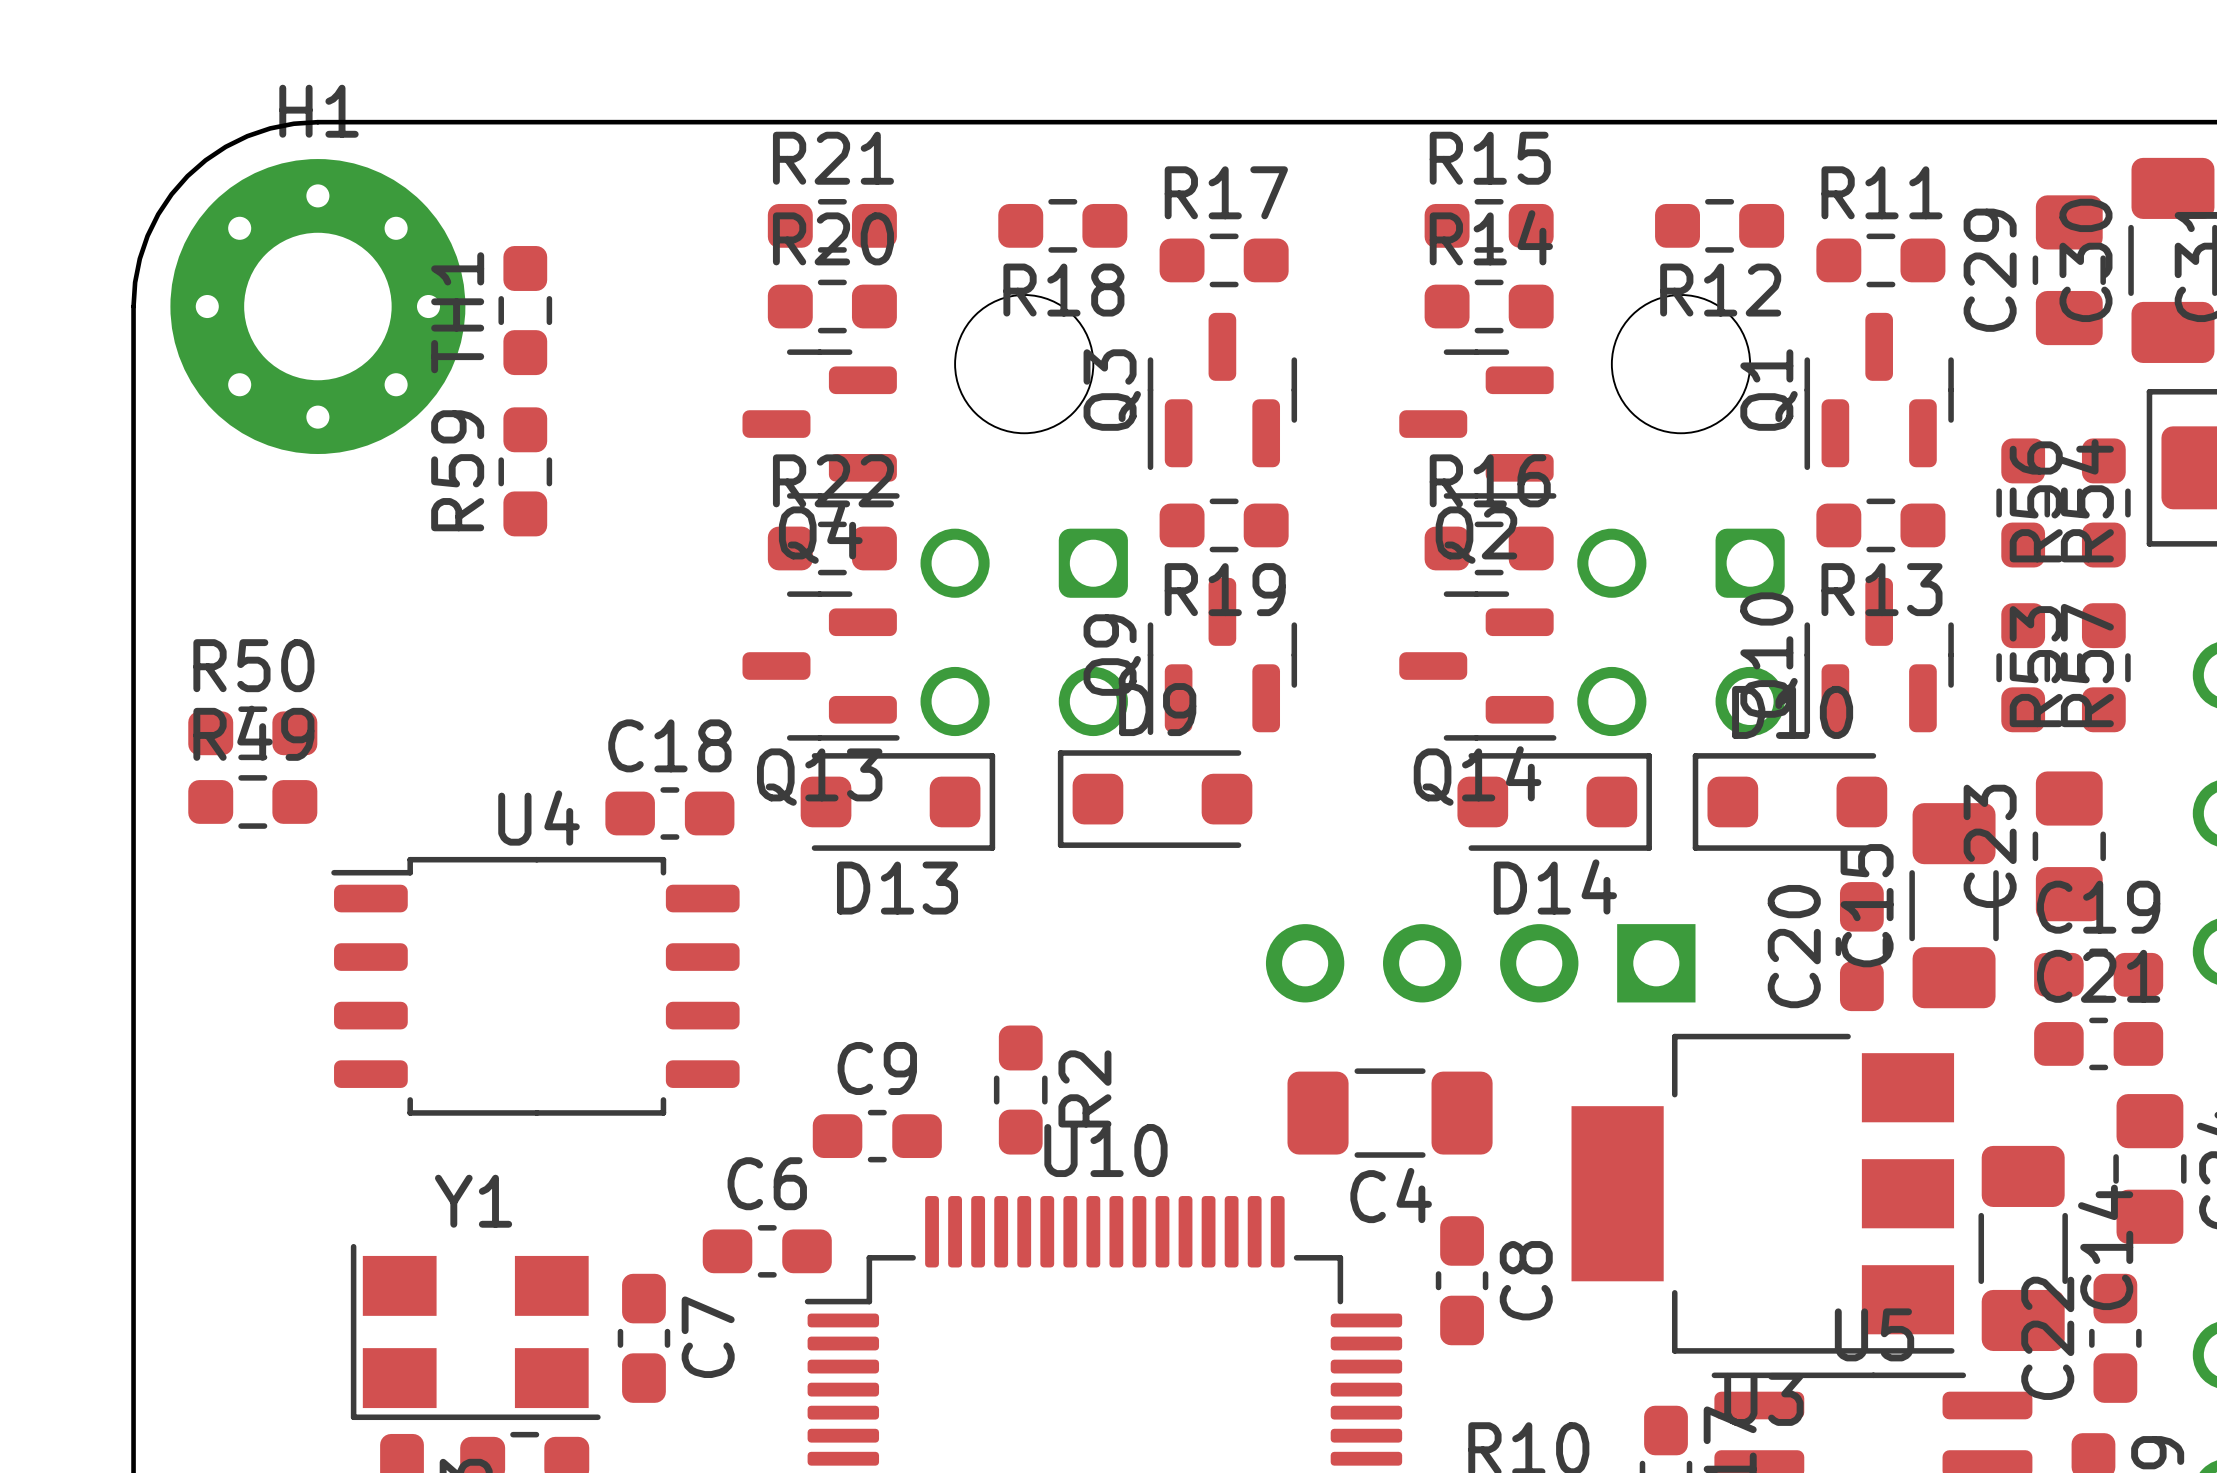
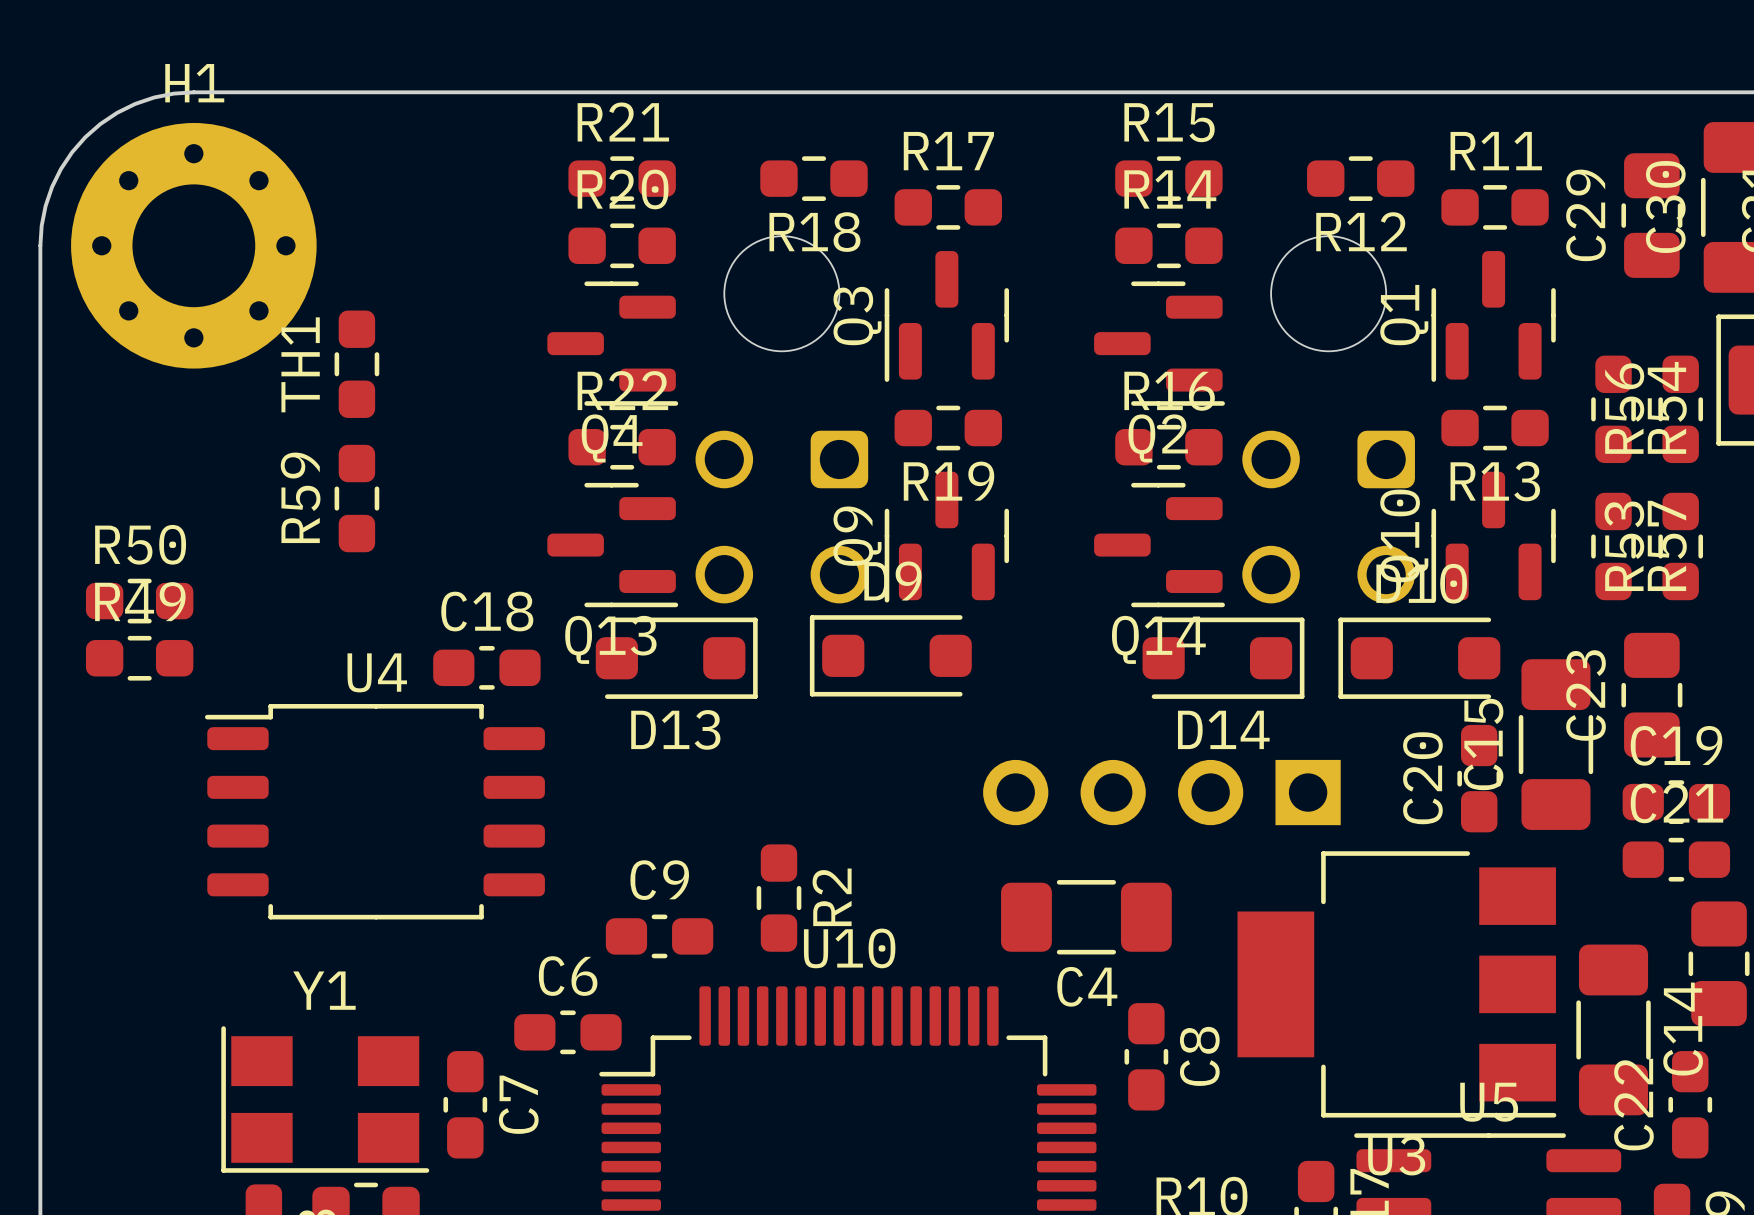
TH1 position: (525, 310) -> (356, 364)
R59 position: (525, 471) -> (356, 498)

